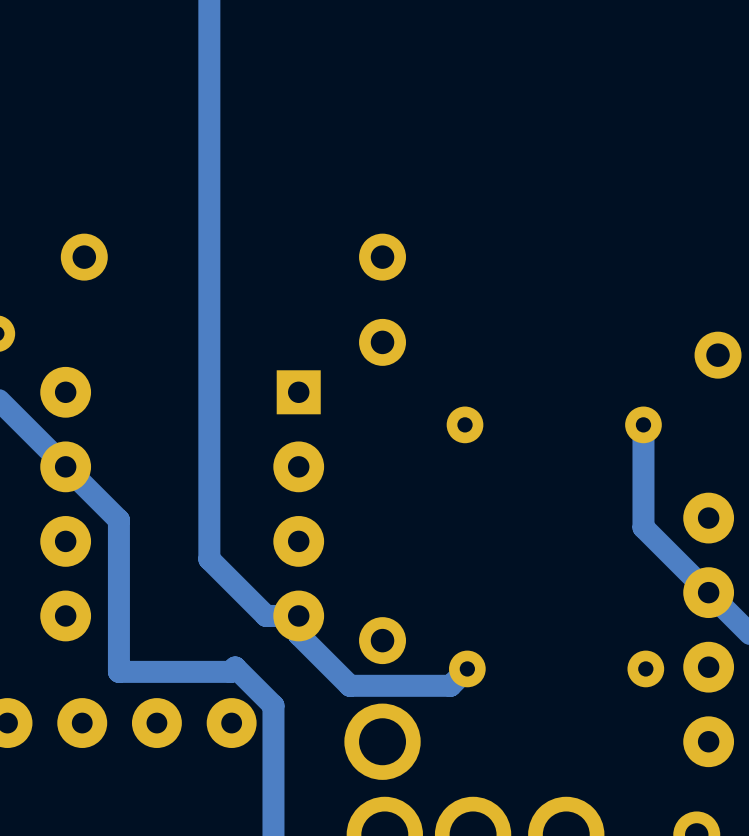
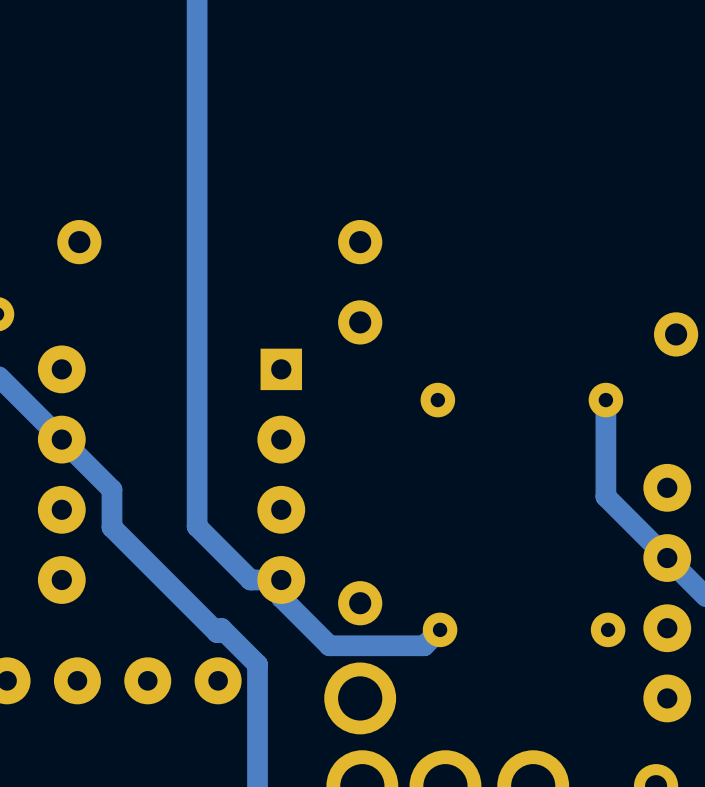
track: (118, 560) (118, 671) (230, 671) -> (111, 527) (217, 632)

